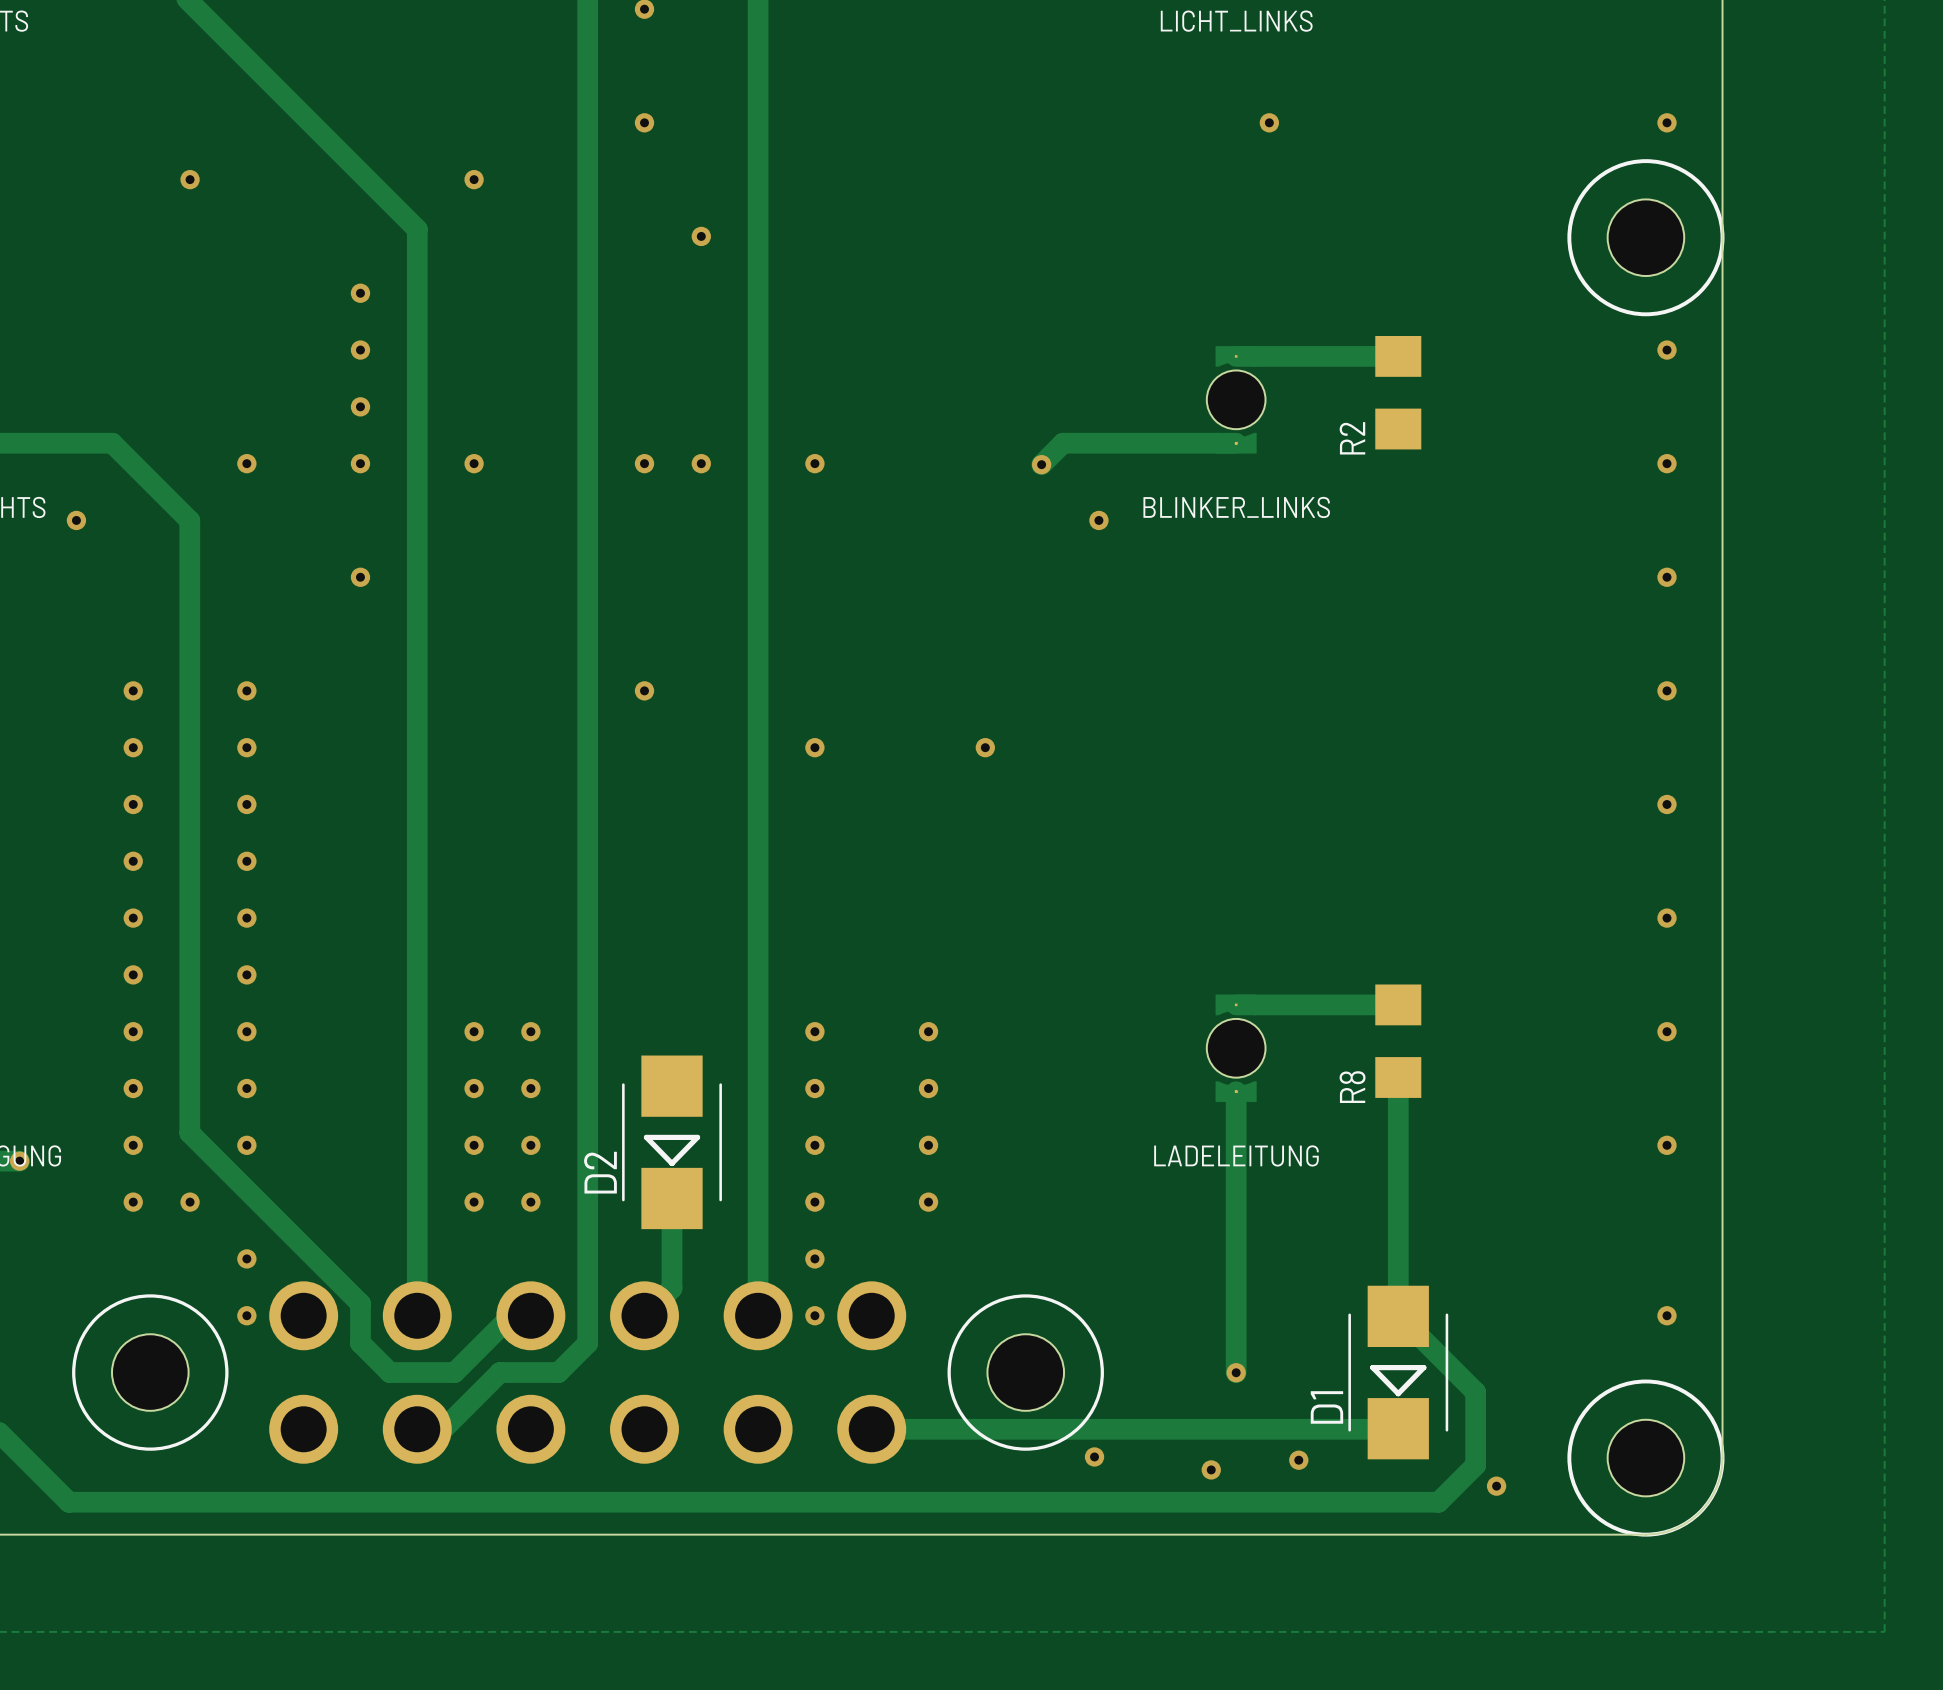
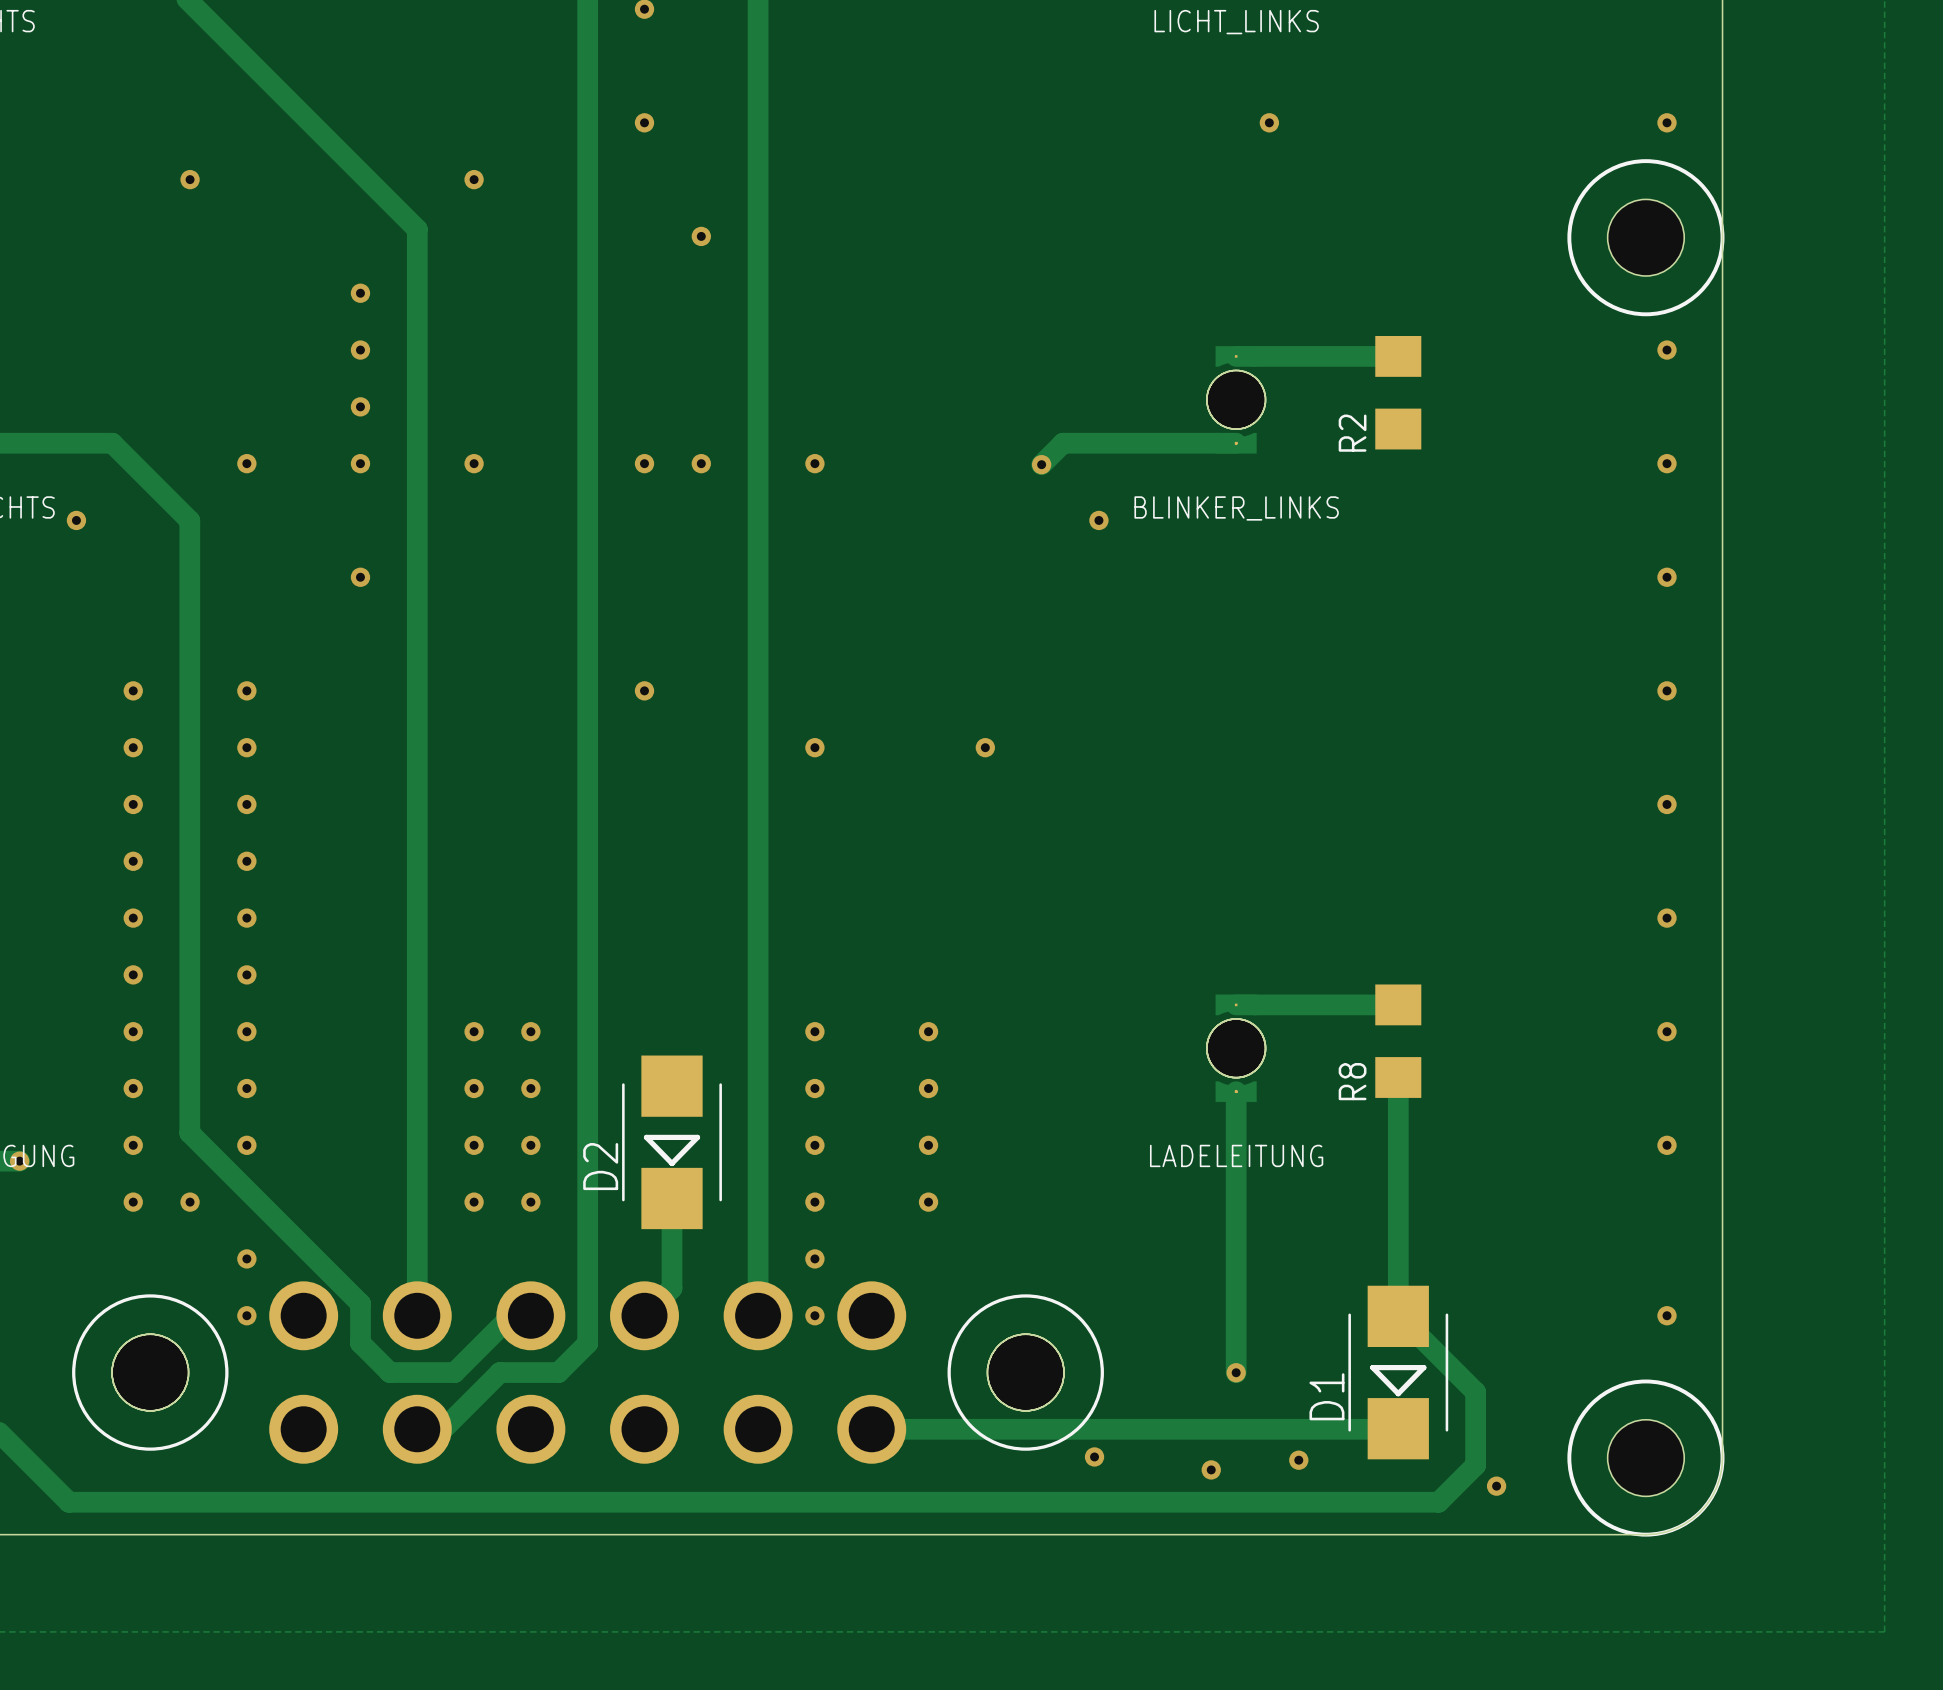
hole: none -> (1236, 399)
hole: none -> (1236, 1048)
hole: none -> (150, 1372)
hole: none -> (1025, 1372)

